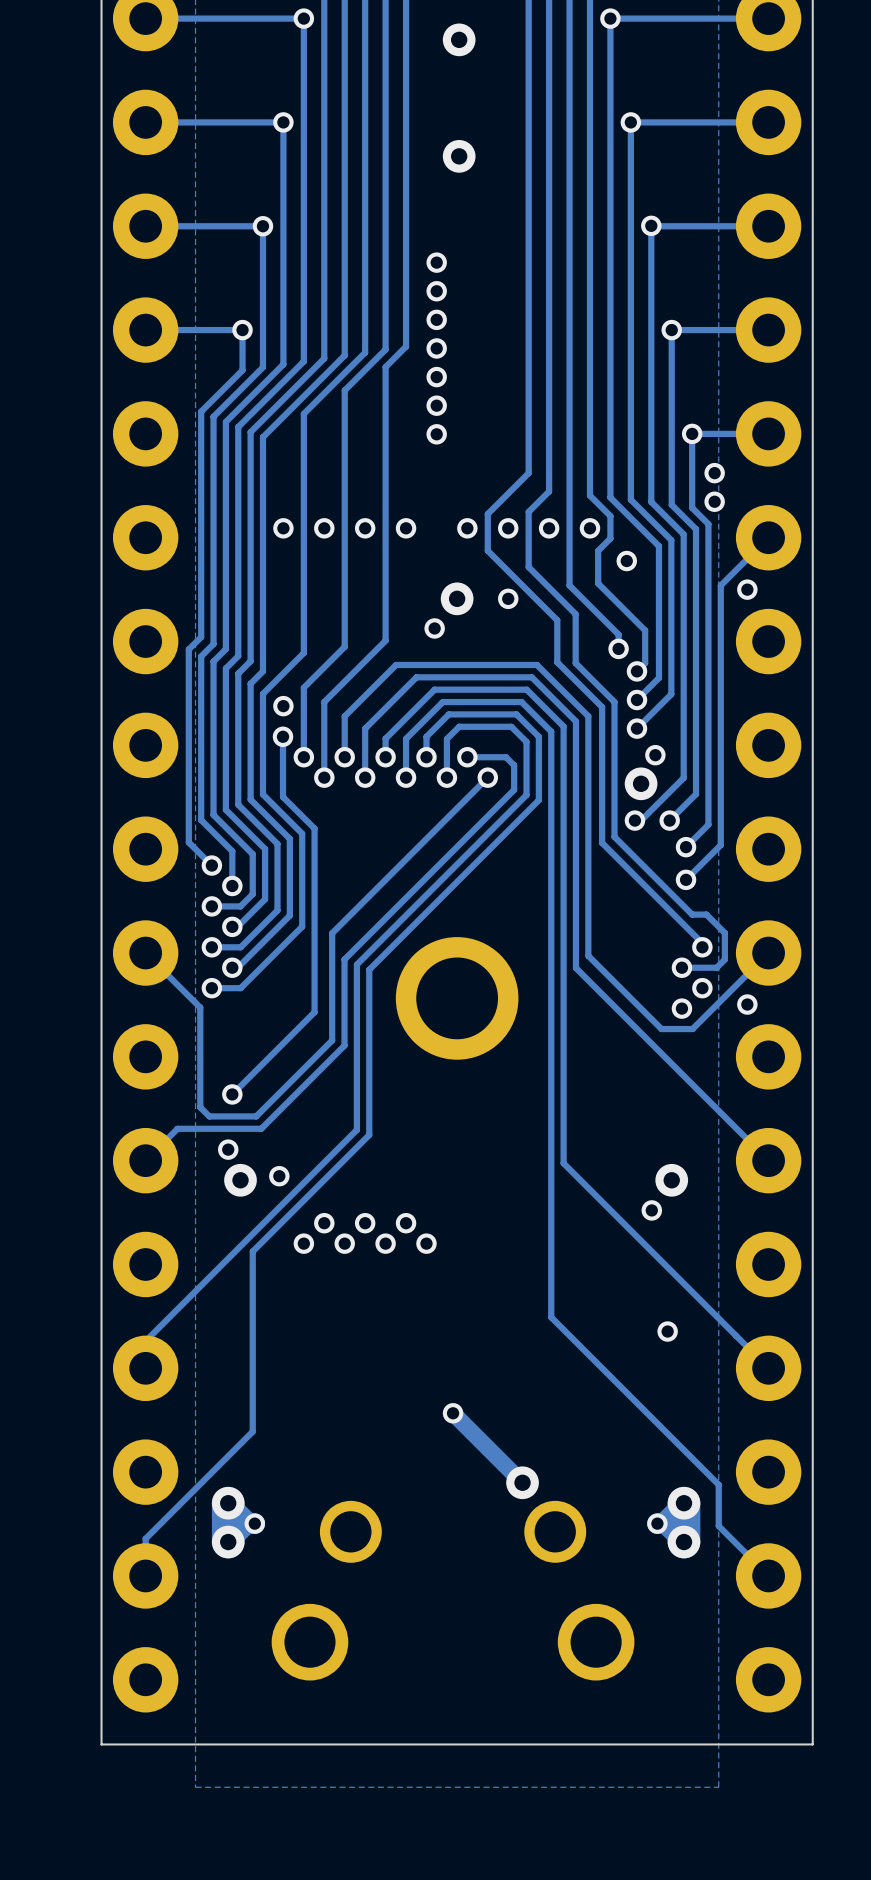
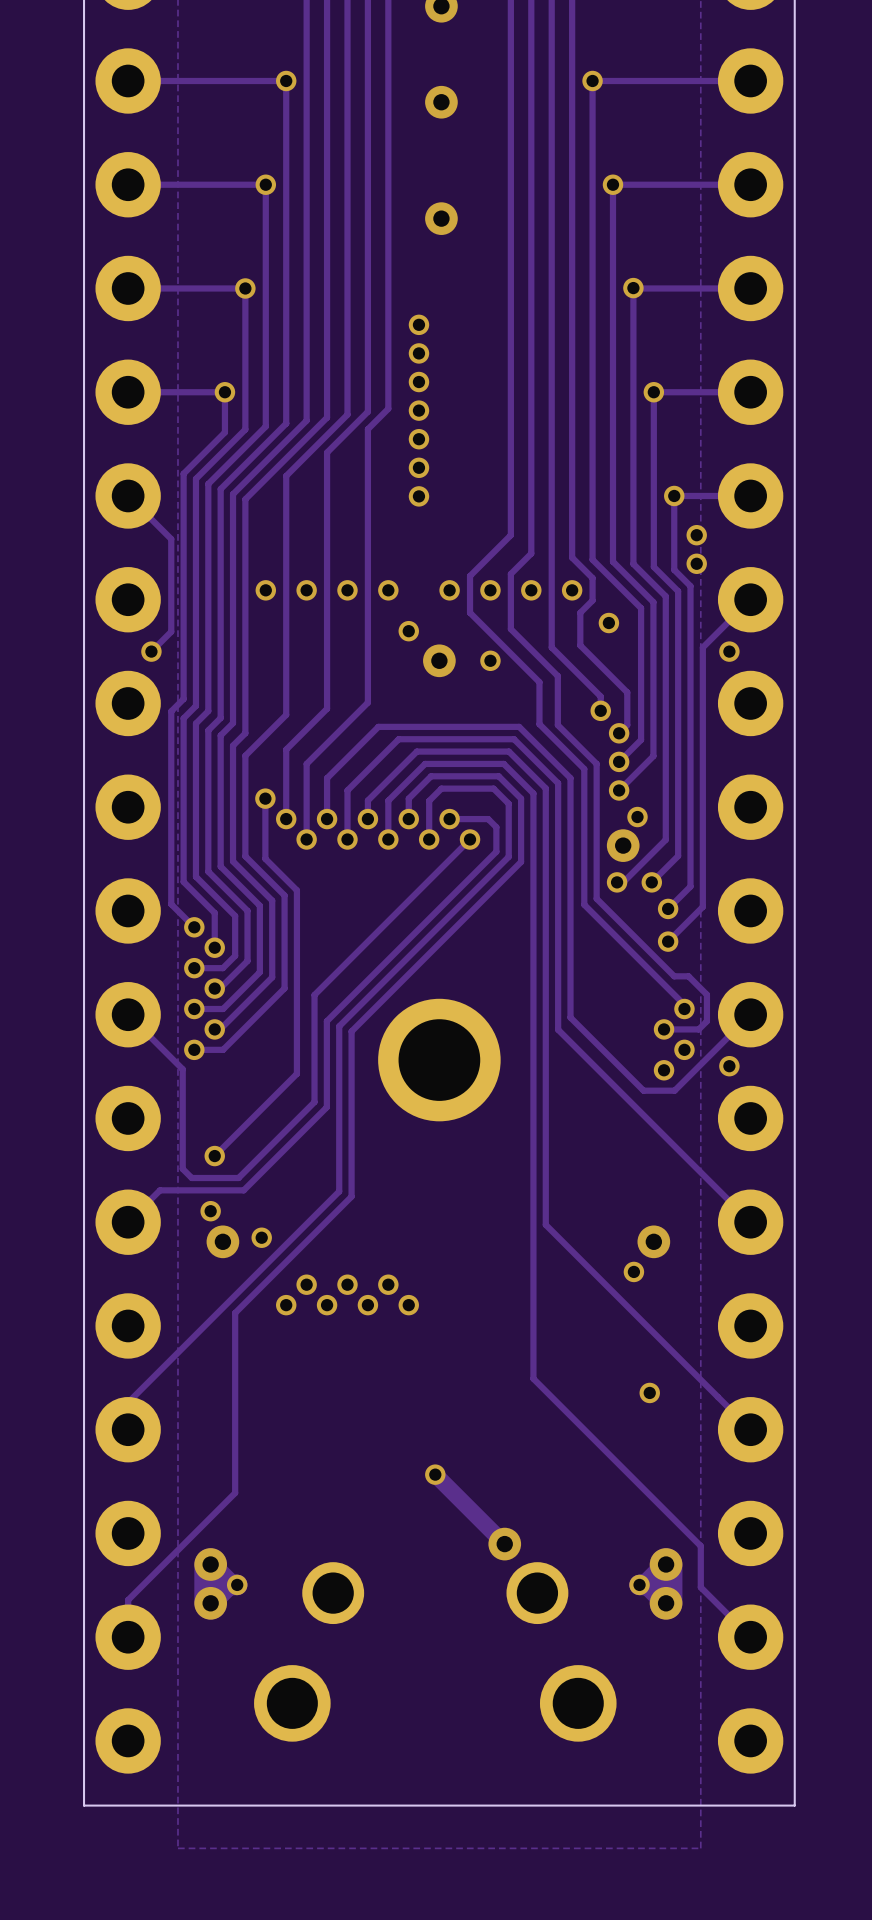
track: none -> (128, 495) (171, 539) (171, 631) (151, 651)
via: none -> (151, 651)
via position: (434, 628) -> (408, 631)
via: (283, 706) -> none

